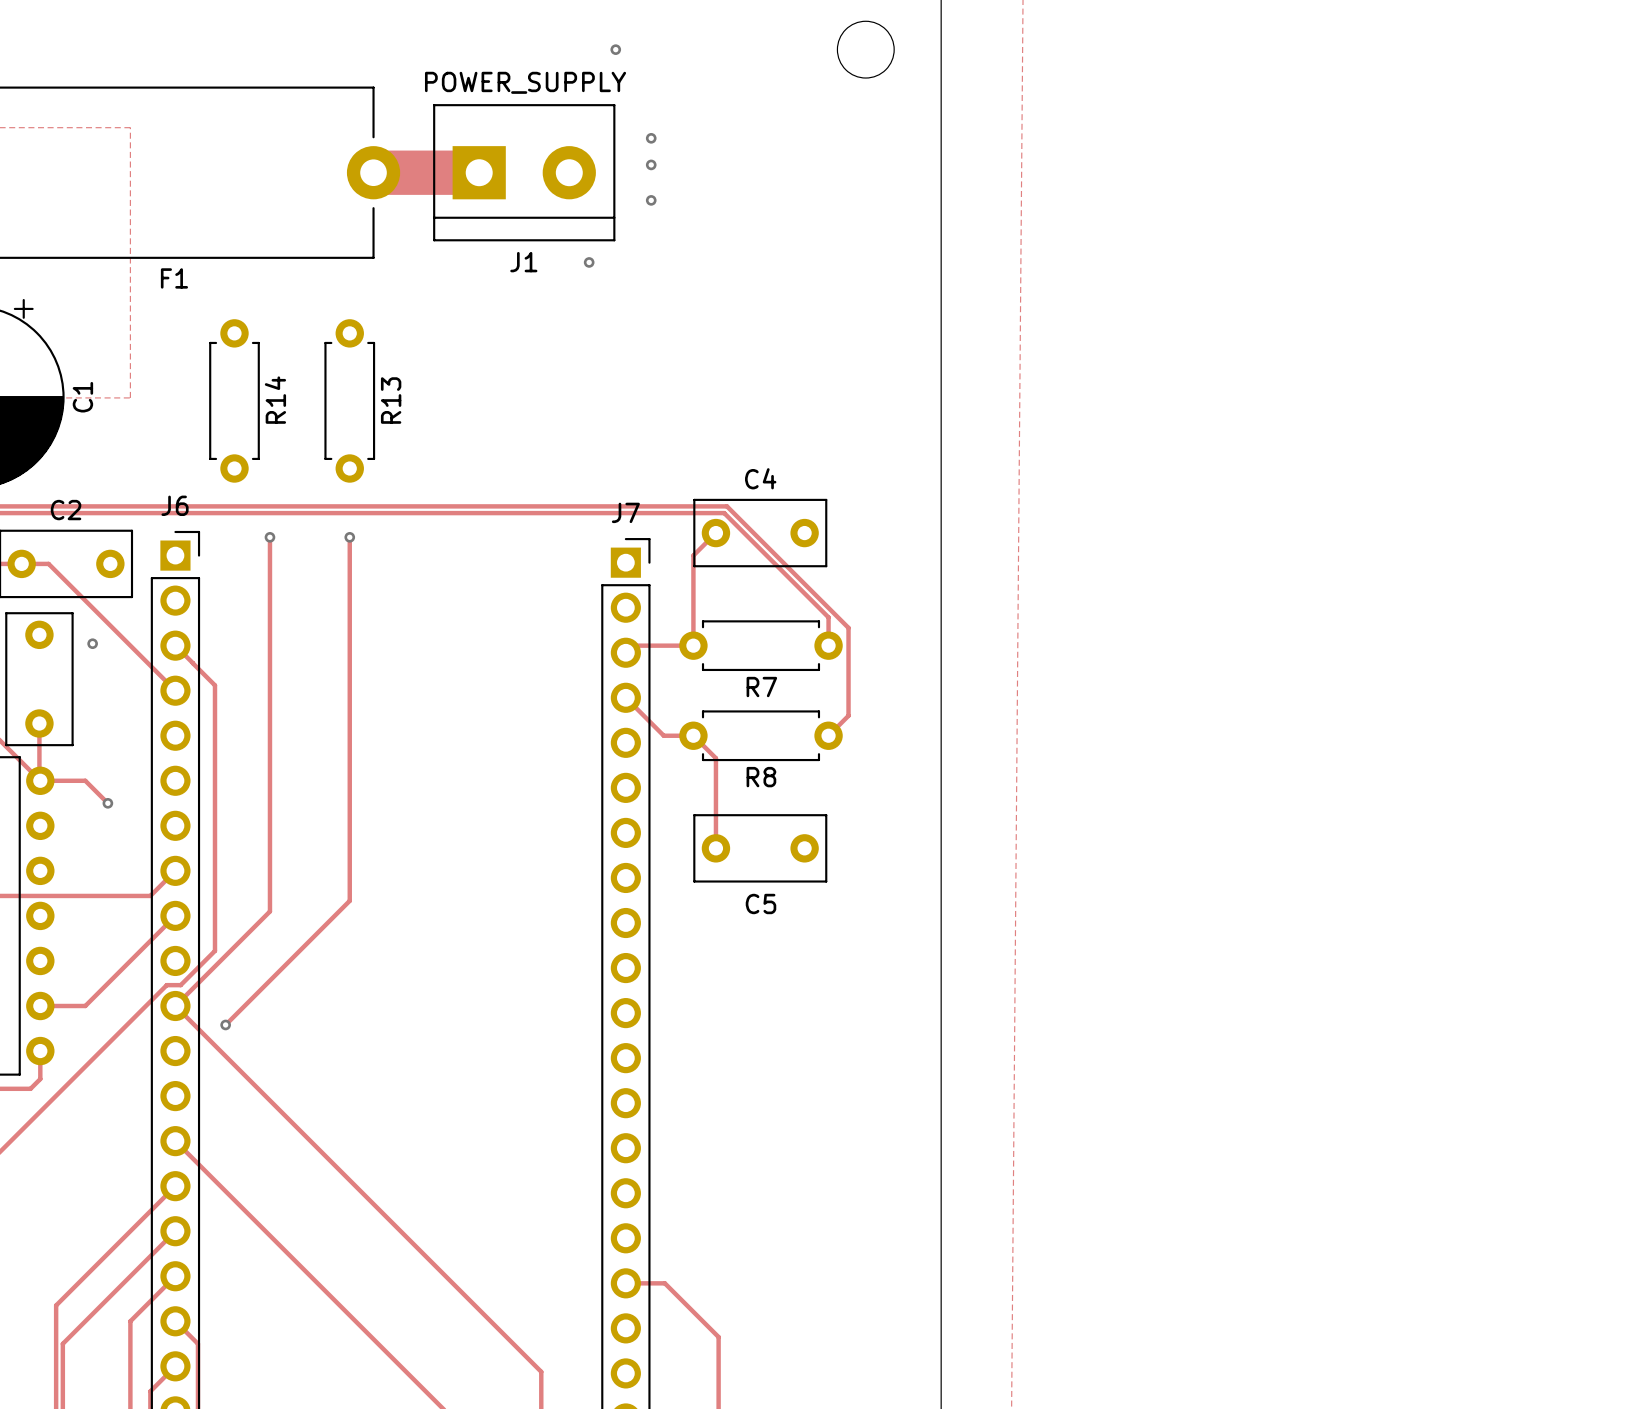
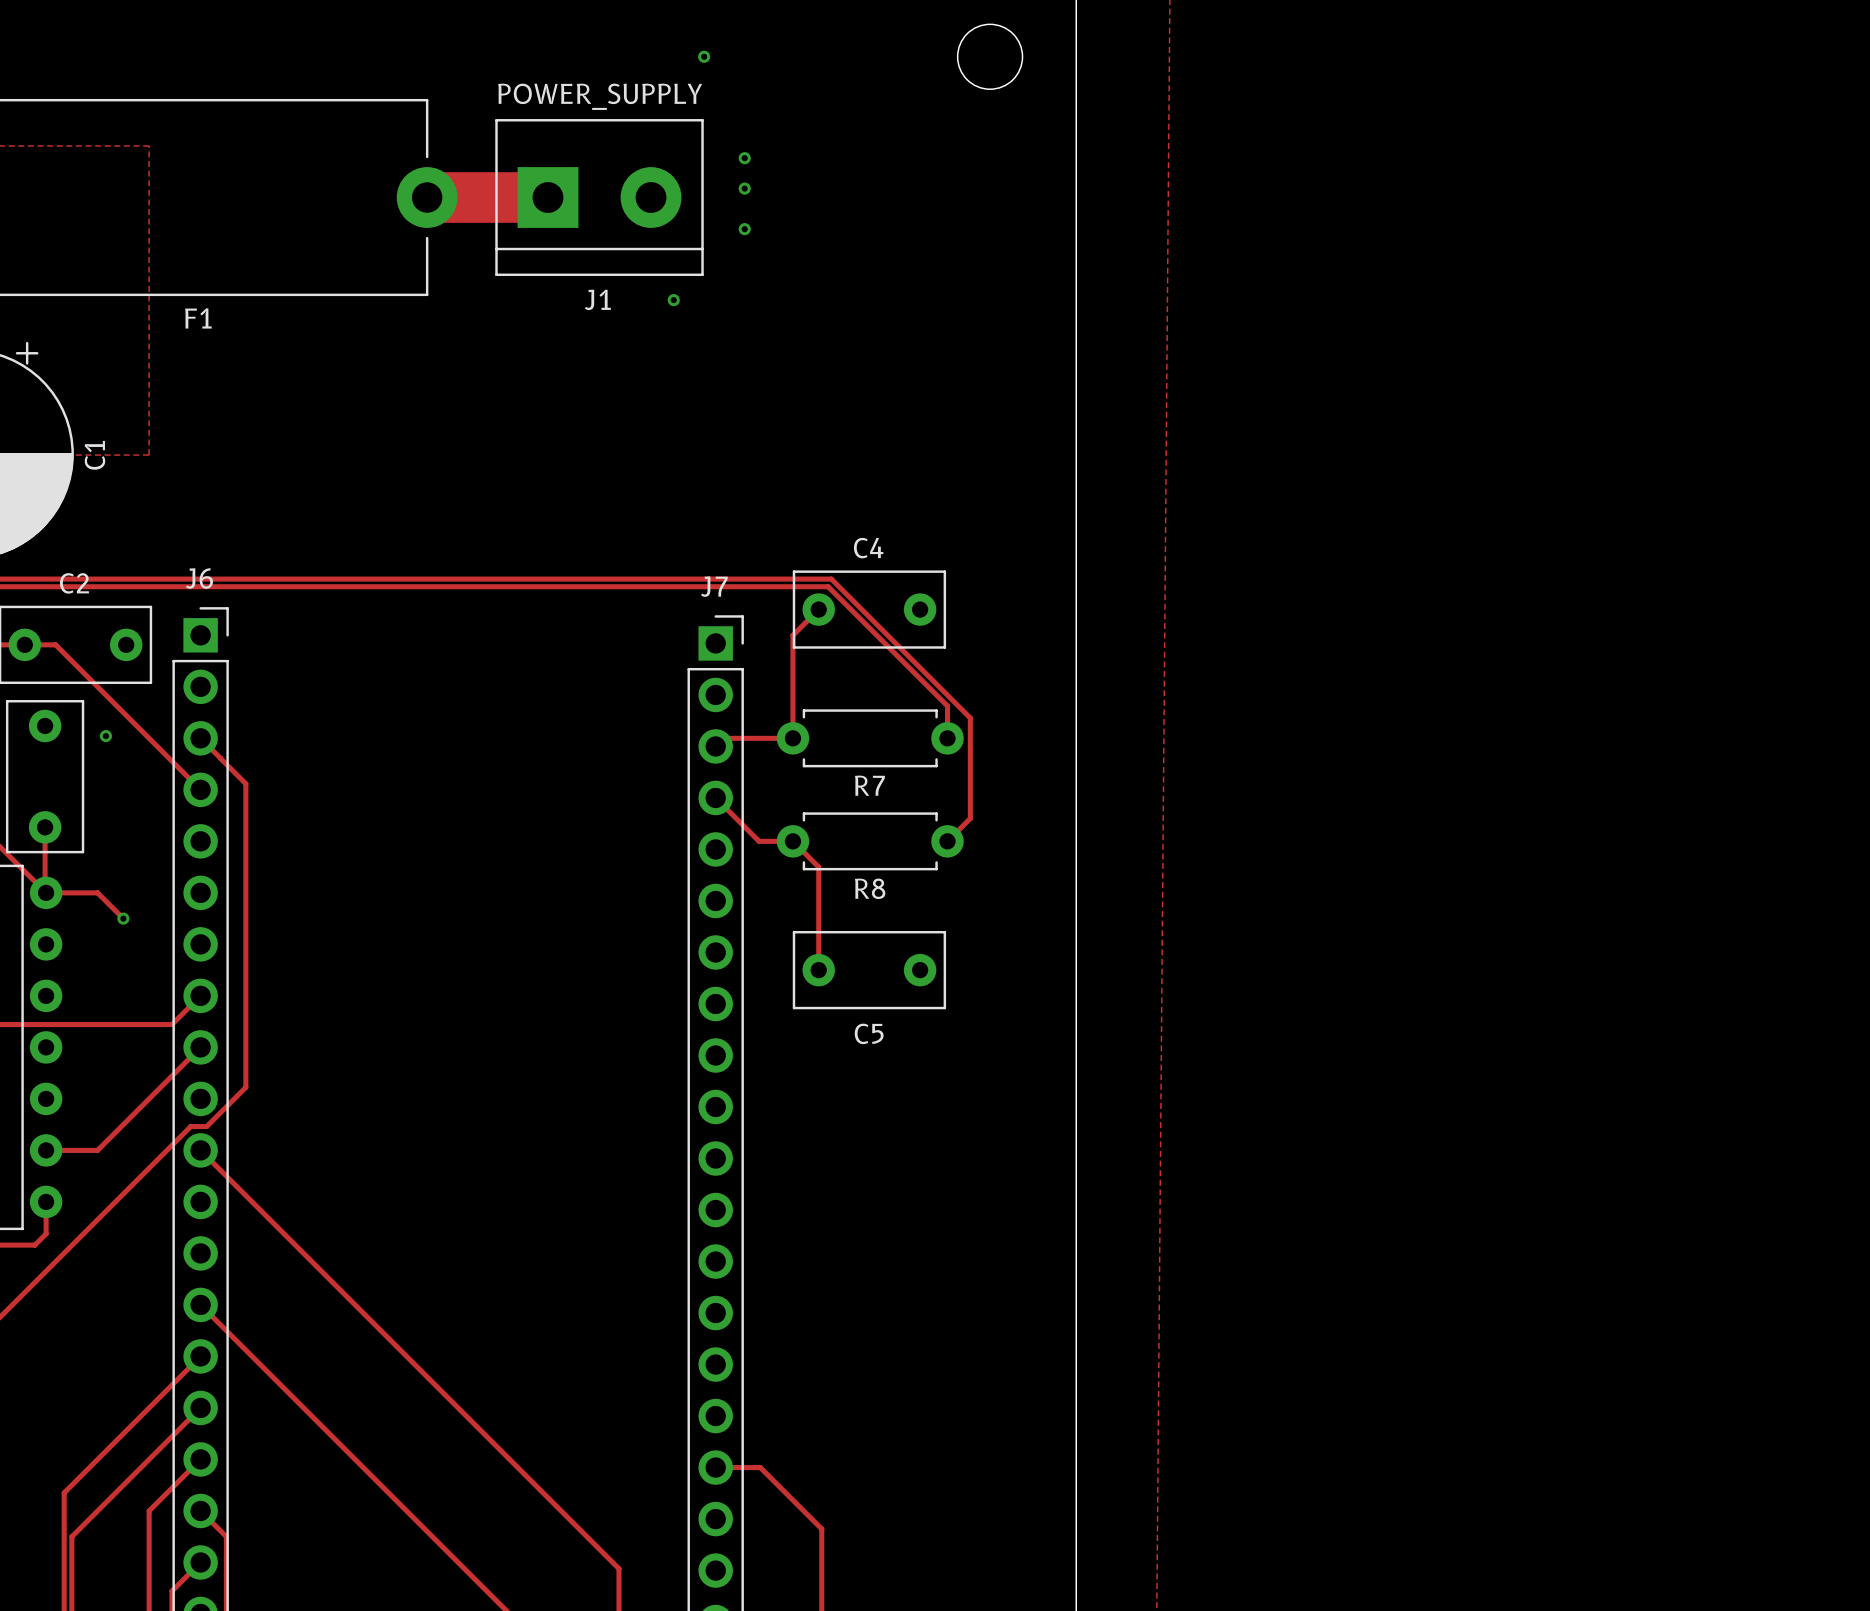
R14: (234, 400) -> none
R13: (349, 400) -> none
track: (269, 537) (269, 911) (175, 1006) -> none
via: (269, 537) -> none
track: (349, 537) (349, 900) (225, 1024) -> none
via: (349, 537) -> none
via: (225, 1024) -> none

